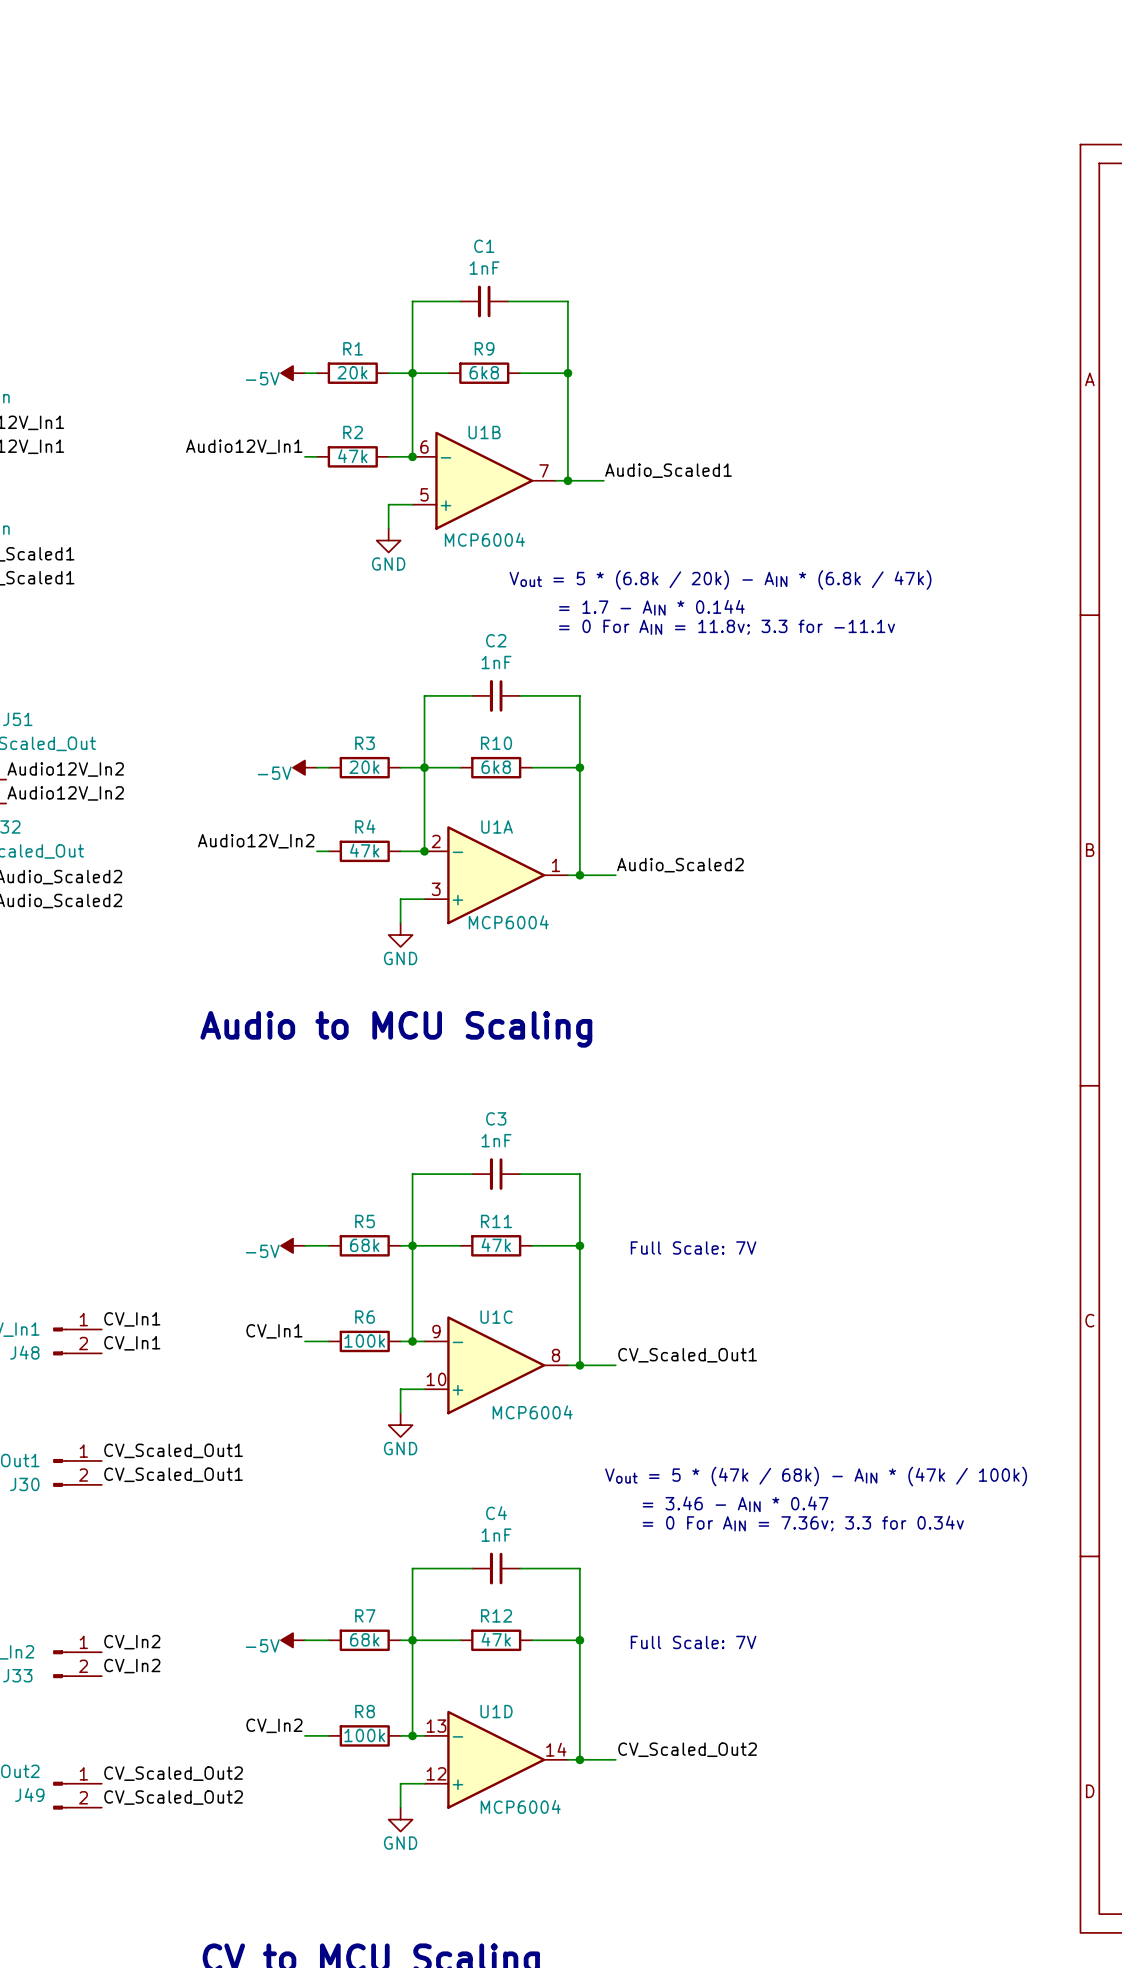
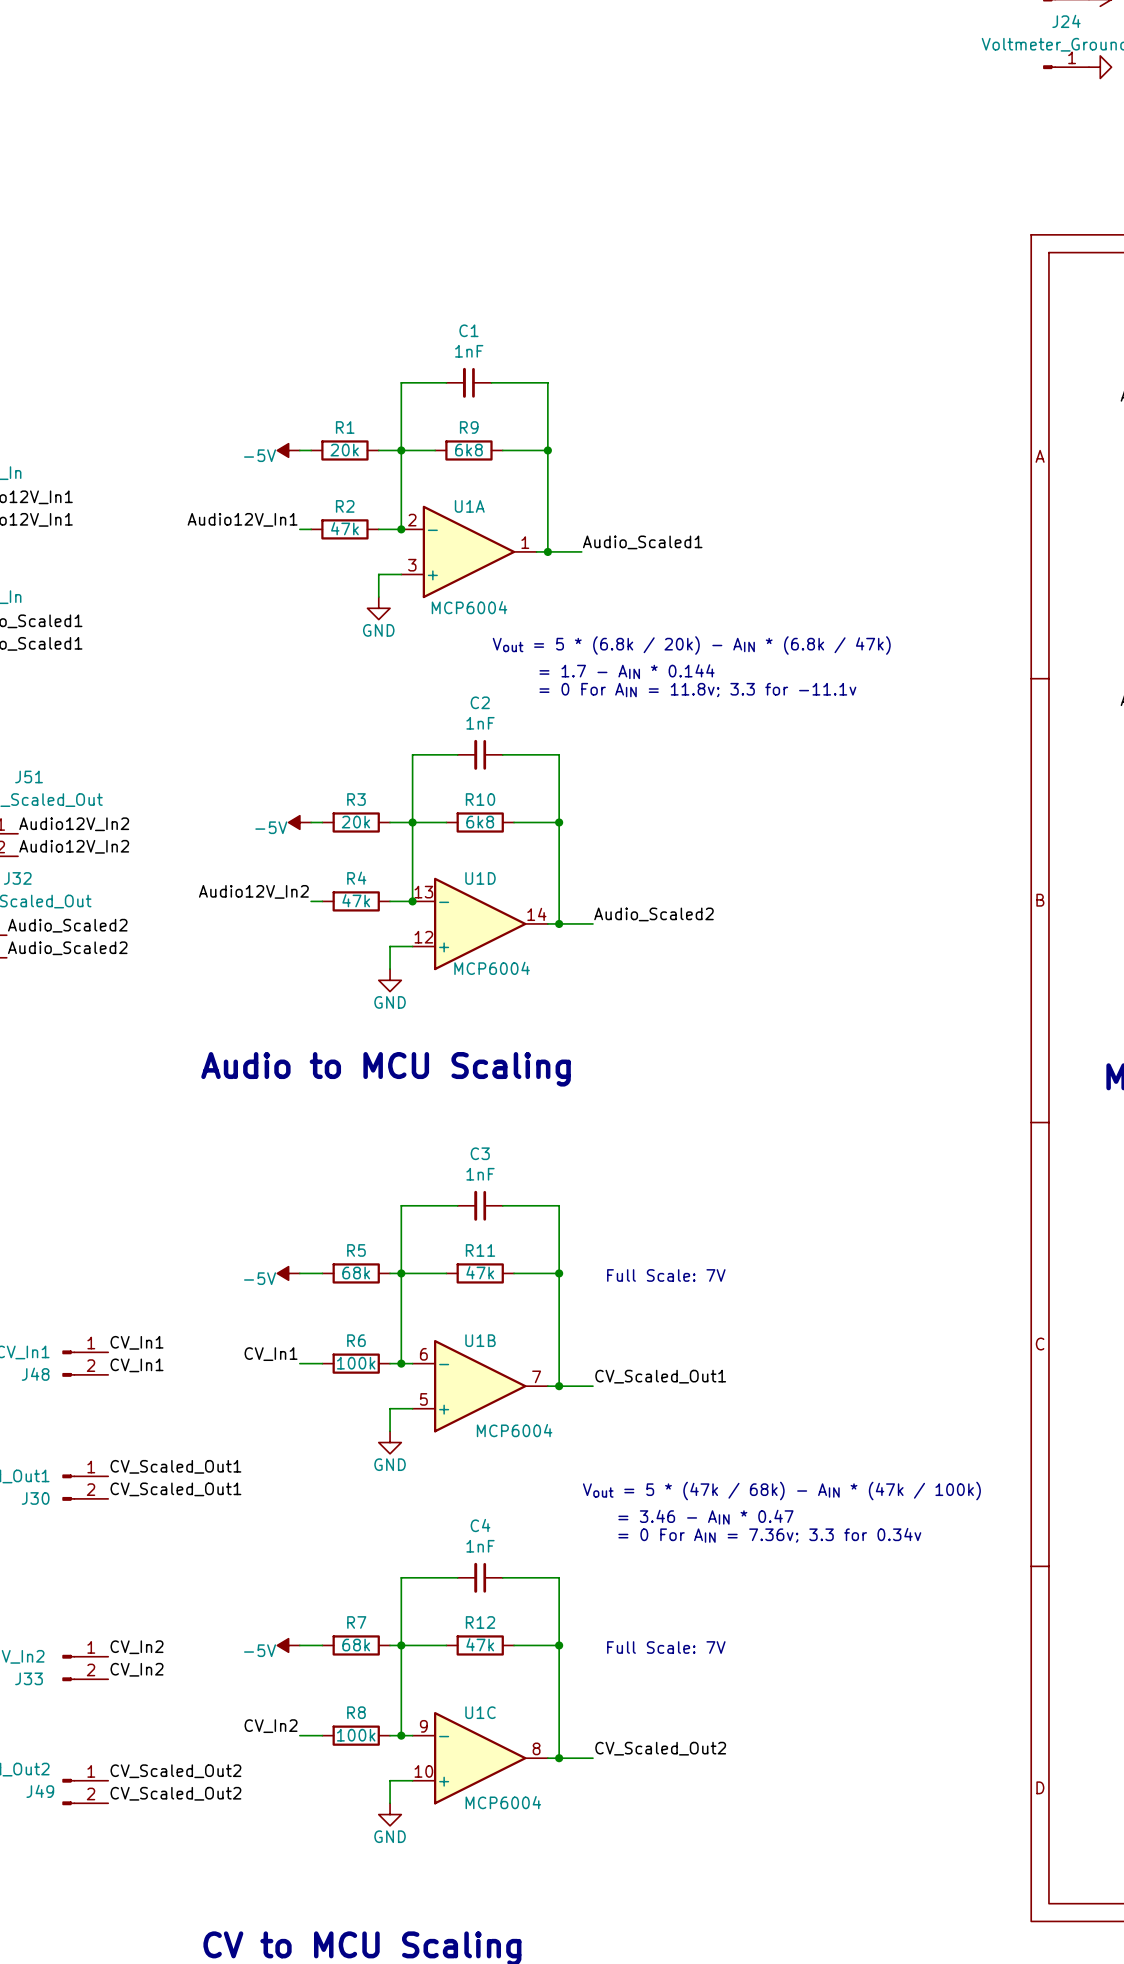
U1B position: (484, 480) -> (480, 1386)
U1A position: (496, 875) -> (468, 551)
U1C position: (496, 1365) -> (480, 1758)
U1D position: (496, 1759) -> (480, 923)

